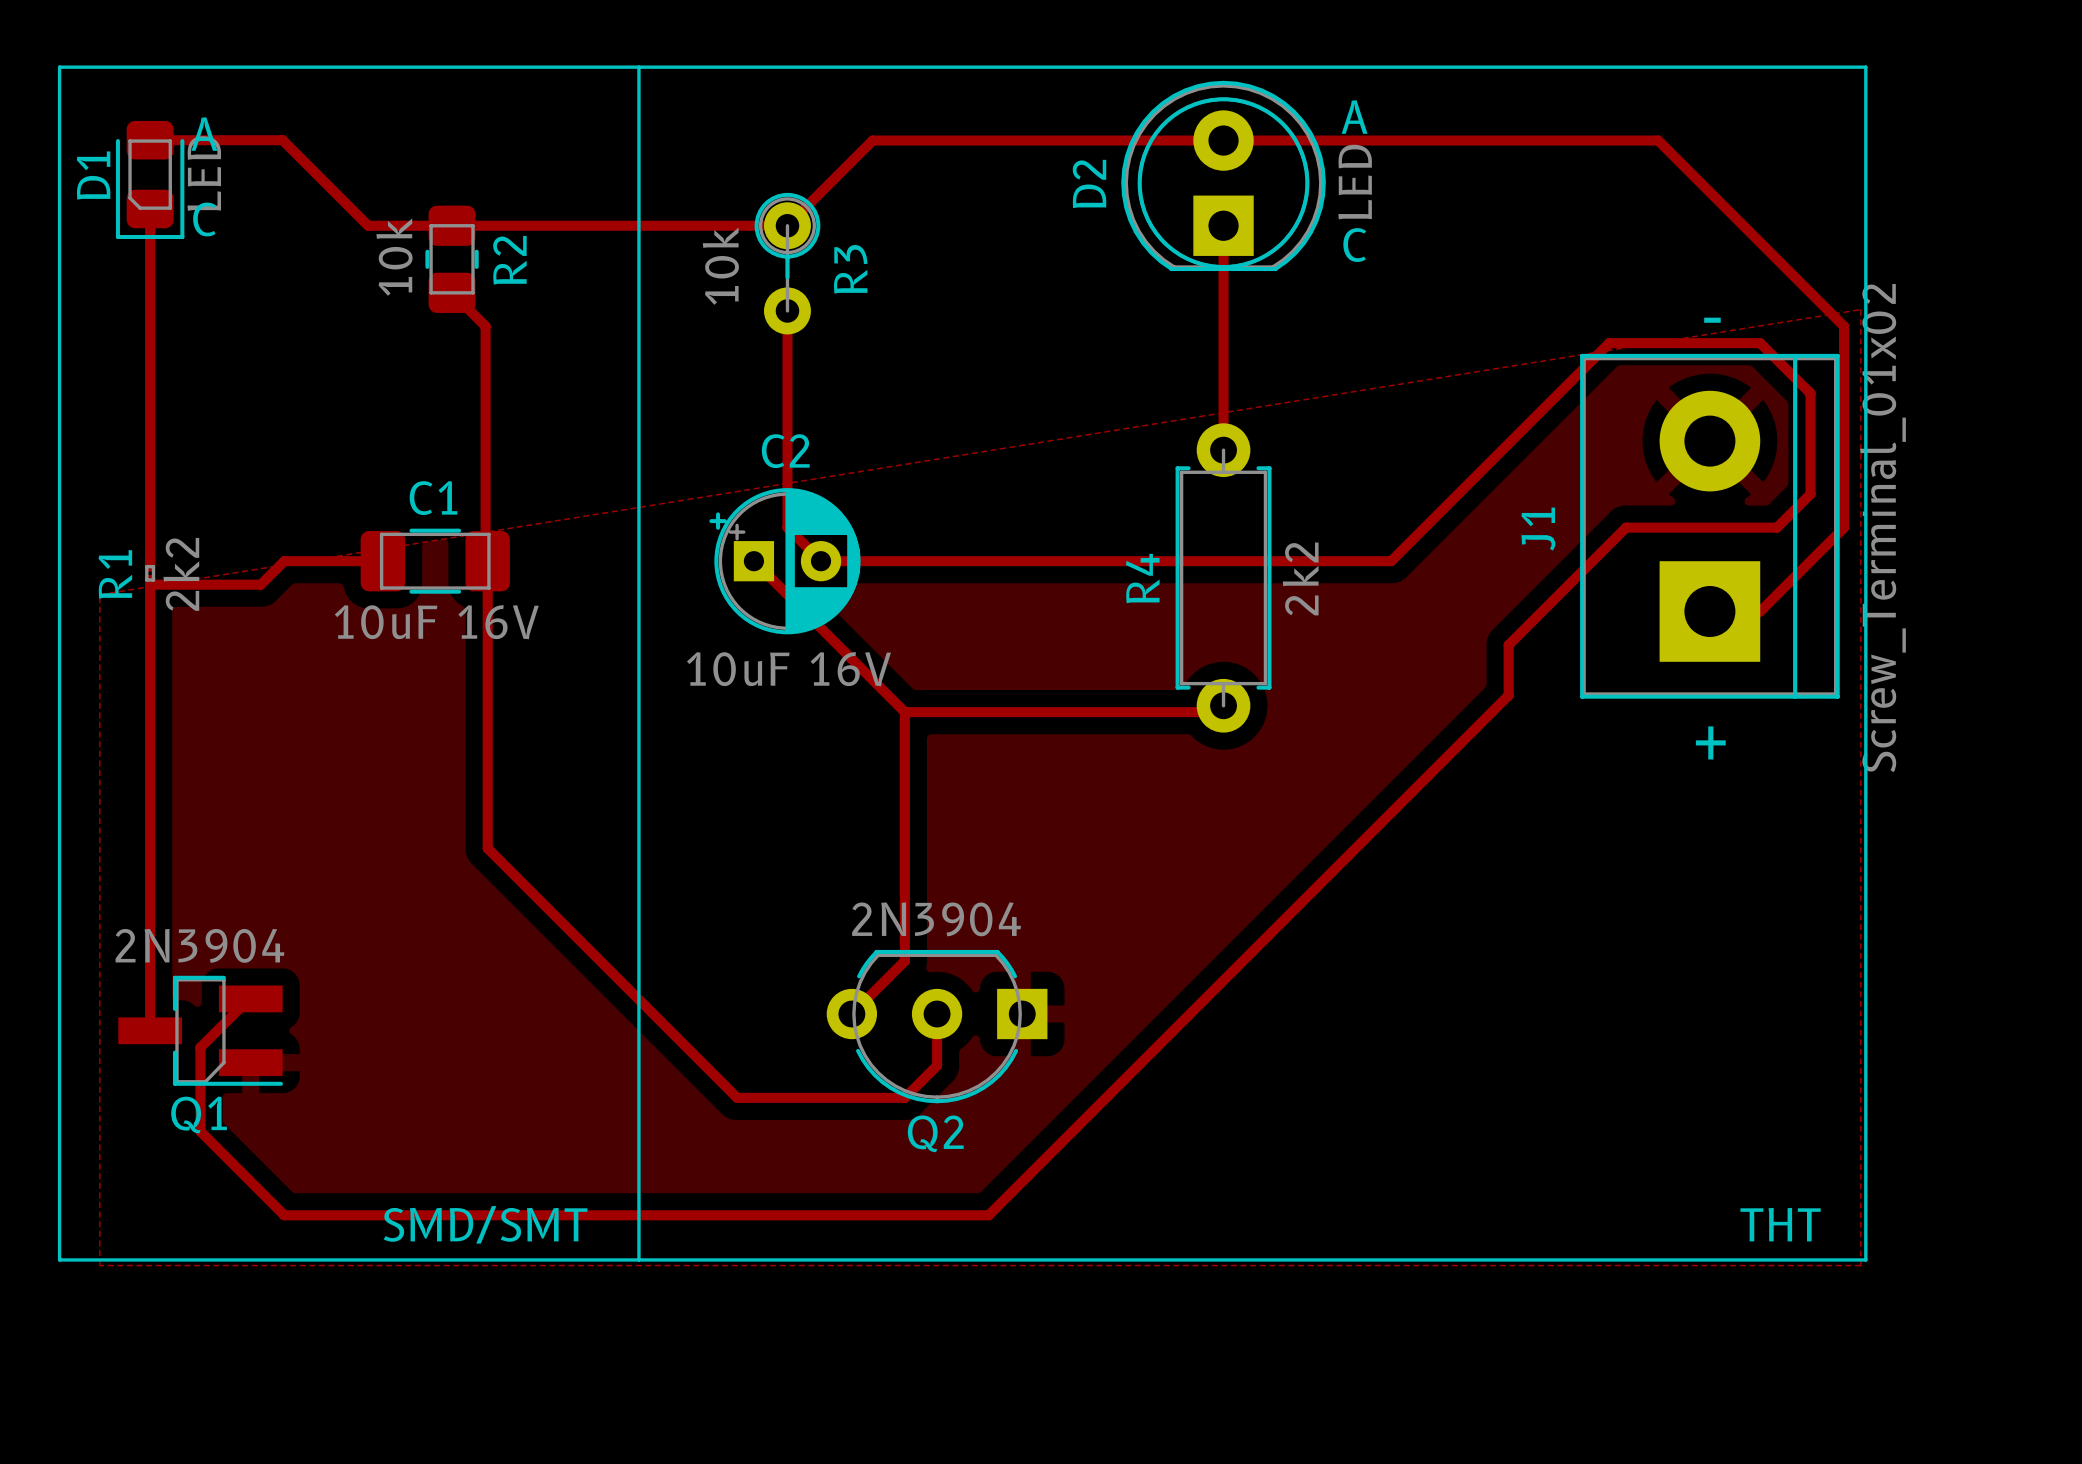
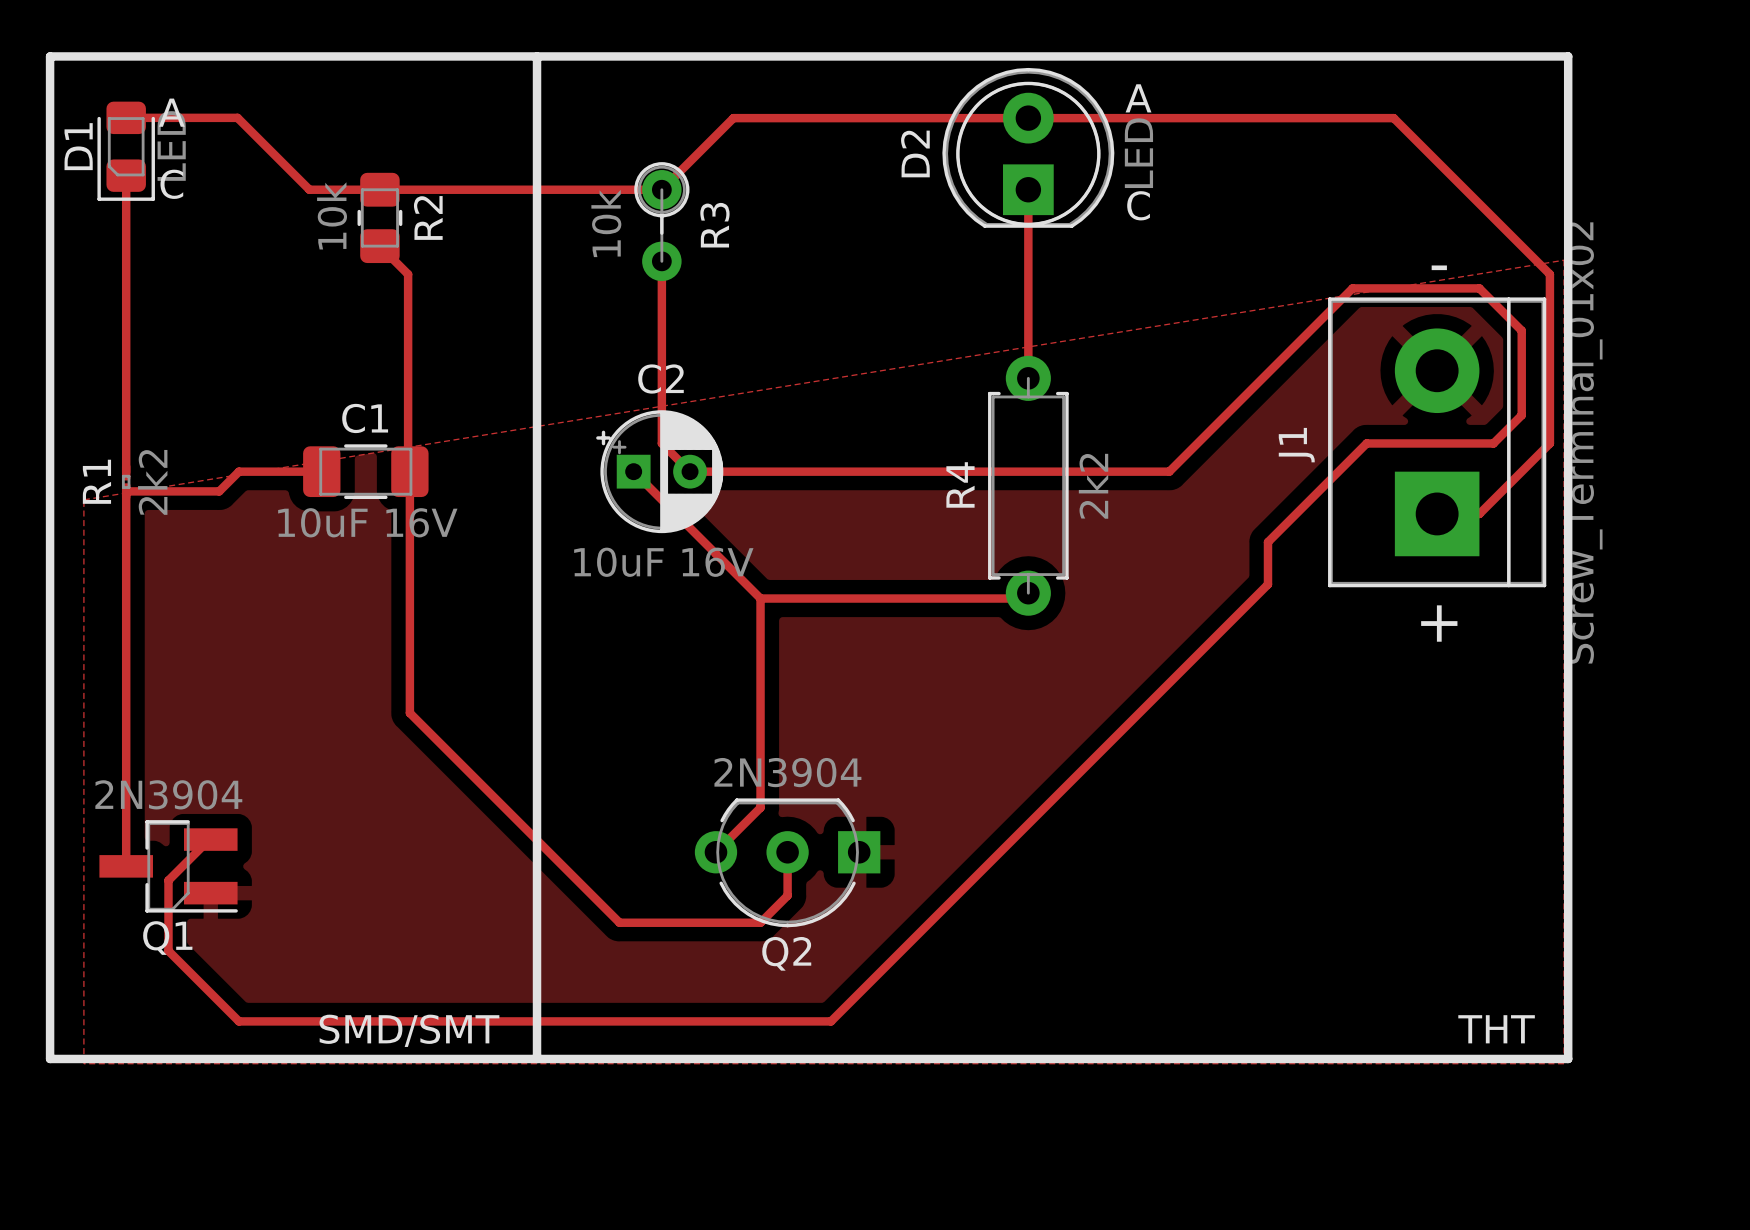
line width: thin (59, 67) (59, 1259) (1865, 1259) (1865, 67) (59, 67) -> thick (50, 56) (50, 1058) (1568, 1058) (1568, 56) (50, 56)
line width: thin (638, 67) (638, 1259) -> thick (537, 56) (537, 1058)

